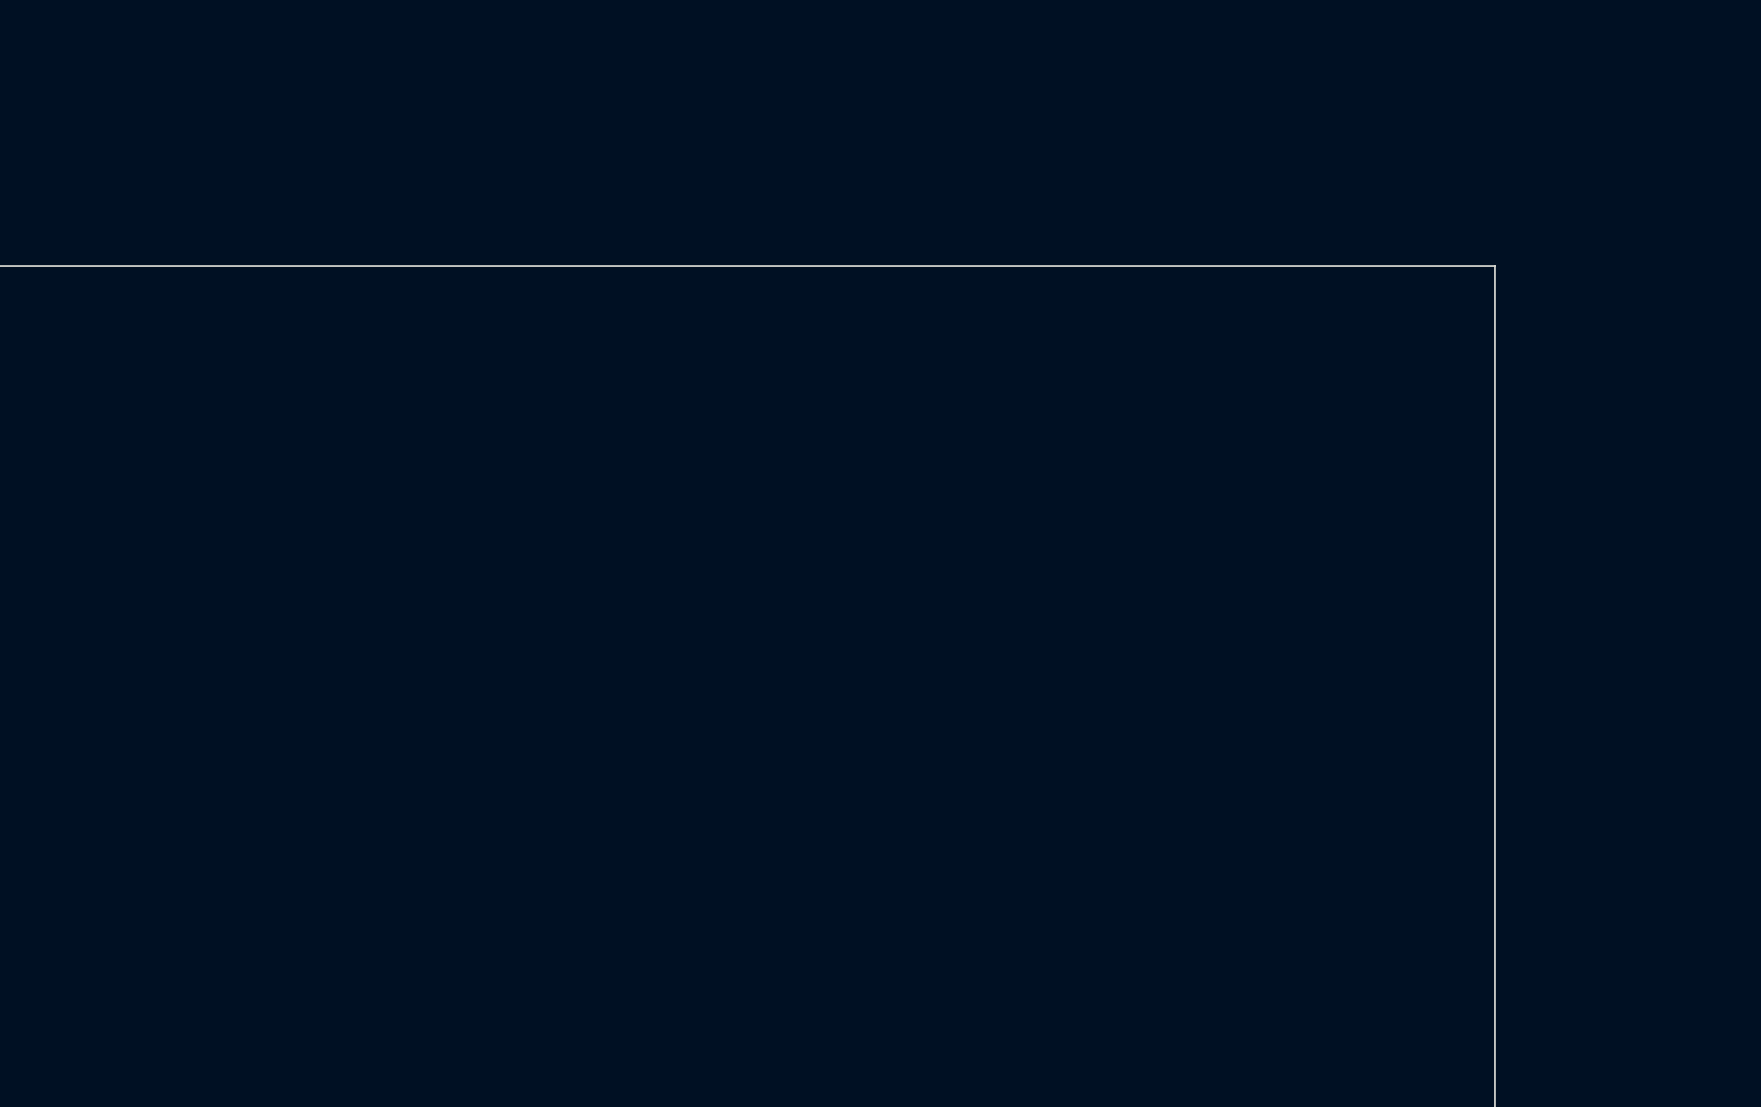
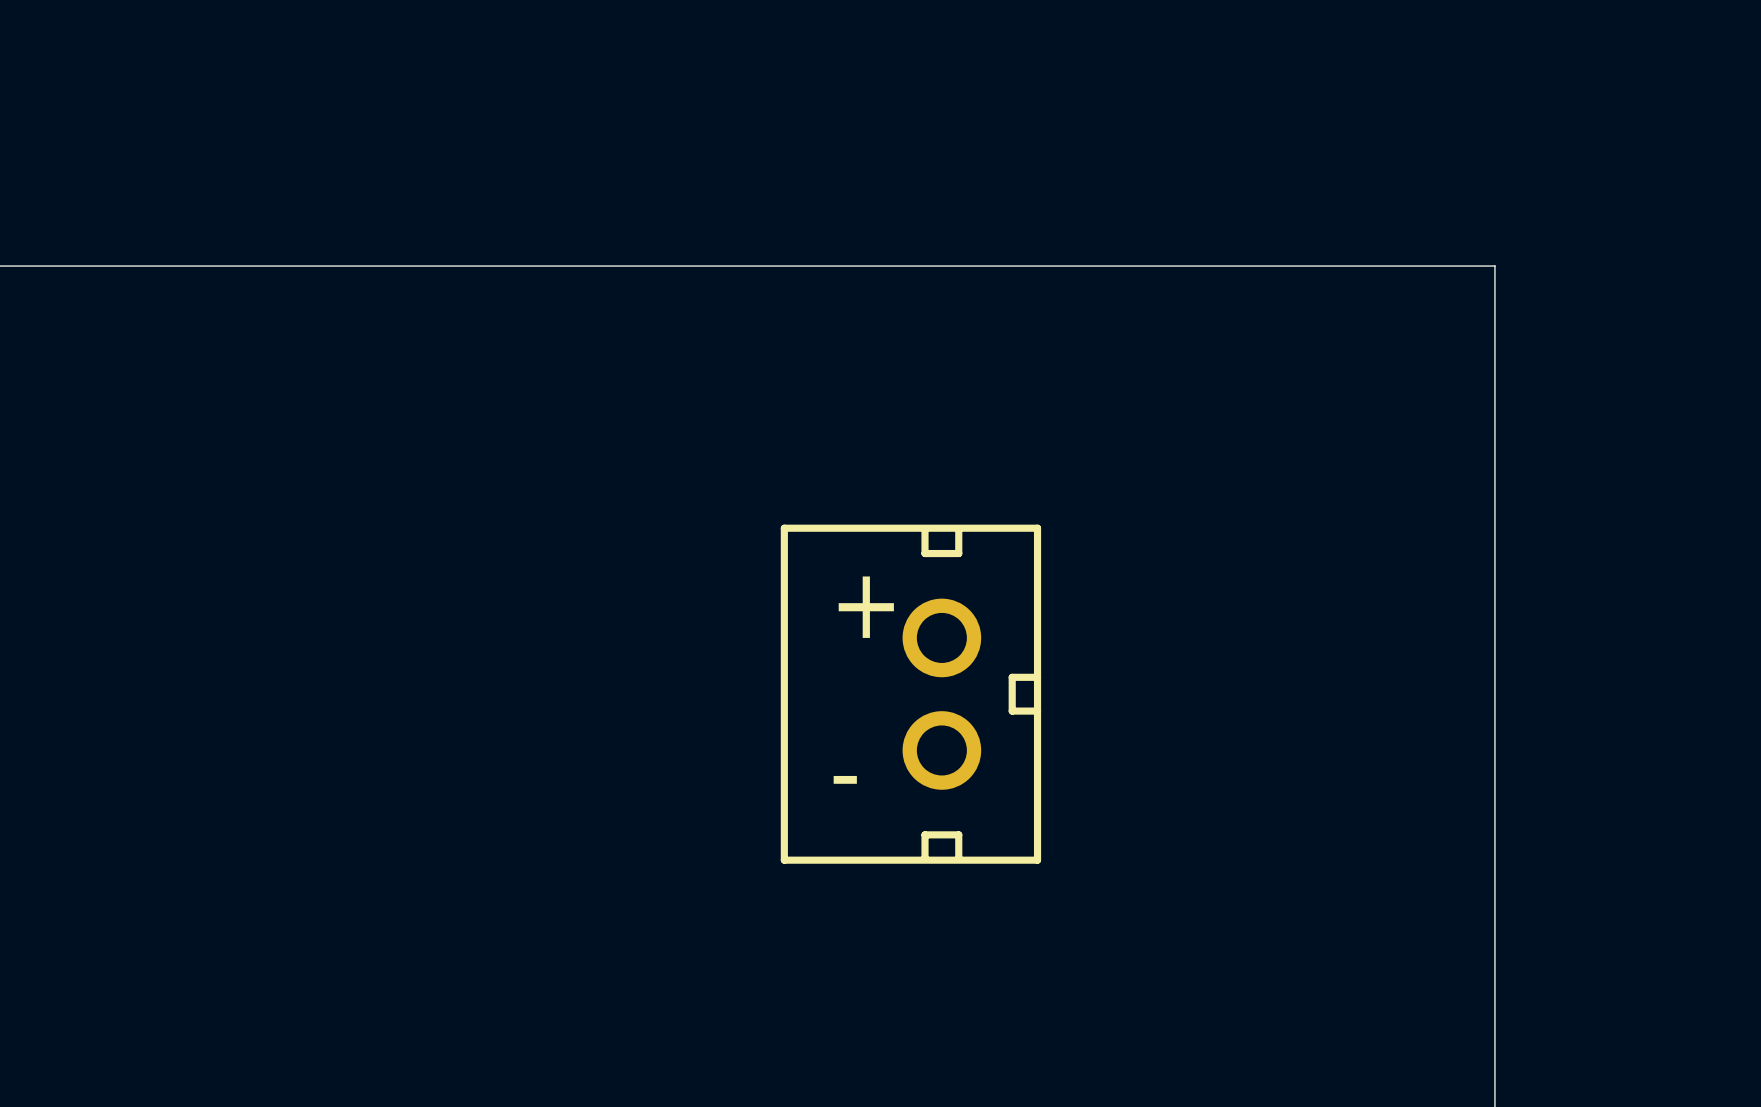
part: none -> (910, 694)

